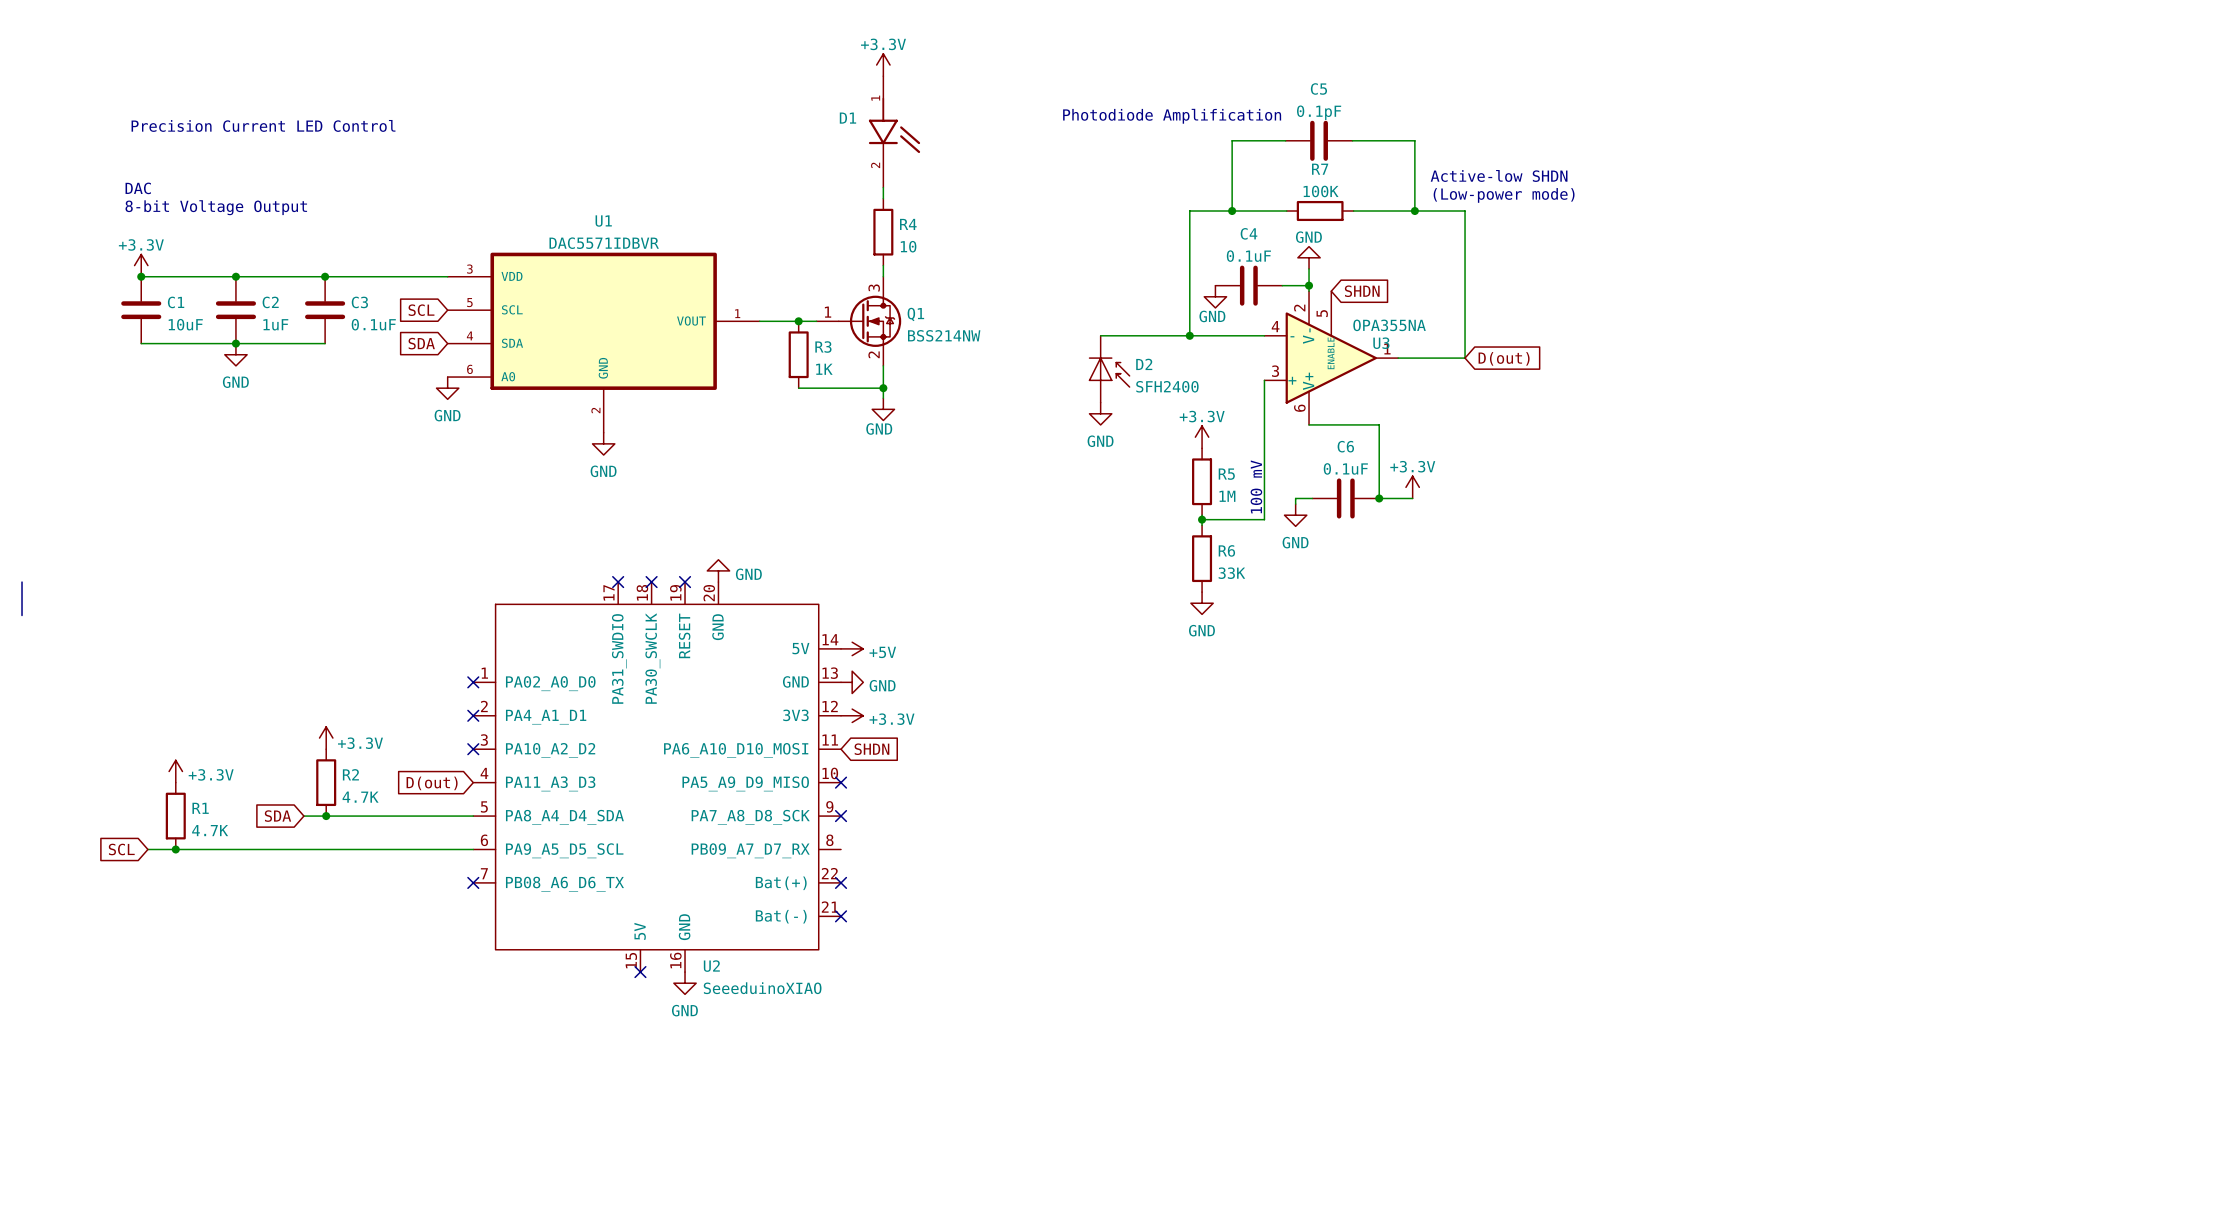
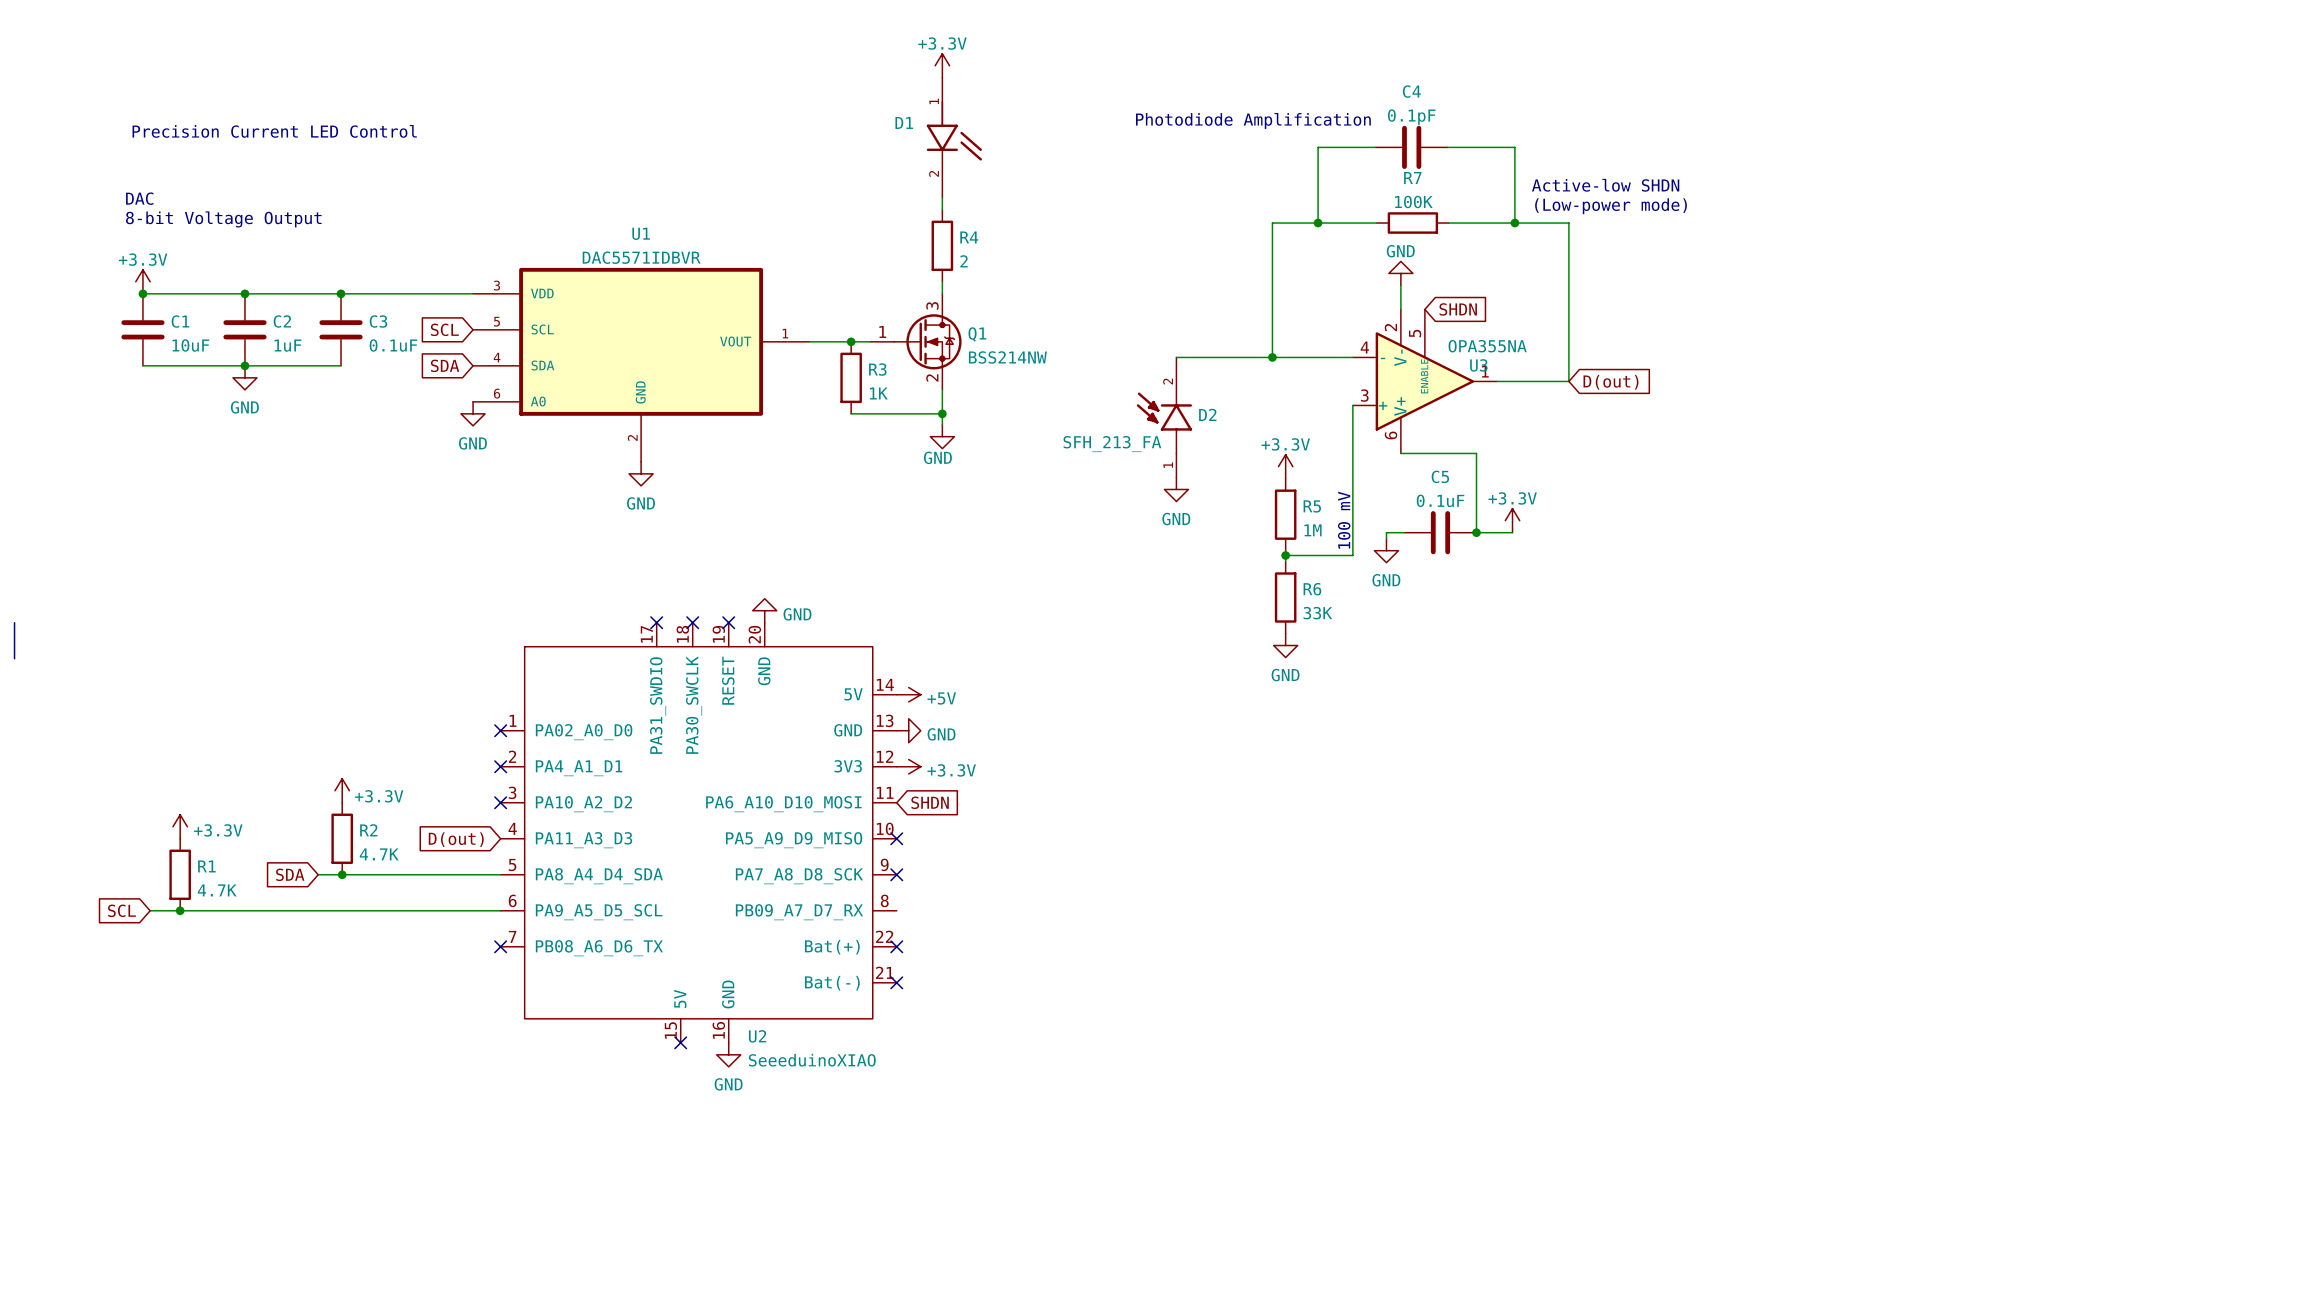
C5 name: C5 (1318, 88) -> C4 (1411, 91)
R4 value: 10 (908, 246) -> 2 (964, 261)
C4: 0.1uF (1248, 285) -> none
wire: (1282, 285) (1309, 285) -> none
junction: (1309, 285) -> none
power symbol: GND (1215, 296) -> none
D2 symbol: [1088, 335, 1130, 403] -> [1136, 357, 1193, 478]
D2 value: SFH2400 (1167, 386) -> SFH_213_FA (1112, 444)
power symbol position: GND (1100, 413) -> GND (1176, 489)
C6 name: C6 (1345, 446) -> C5 (1440, 476)

